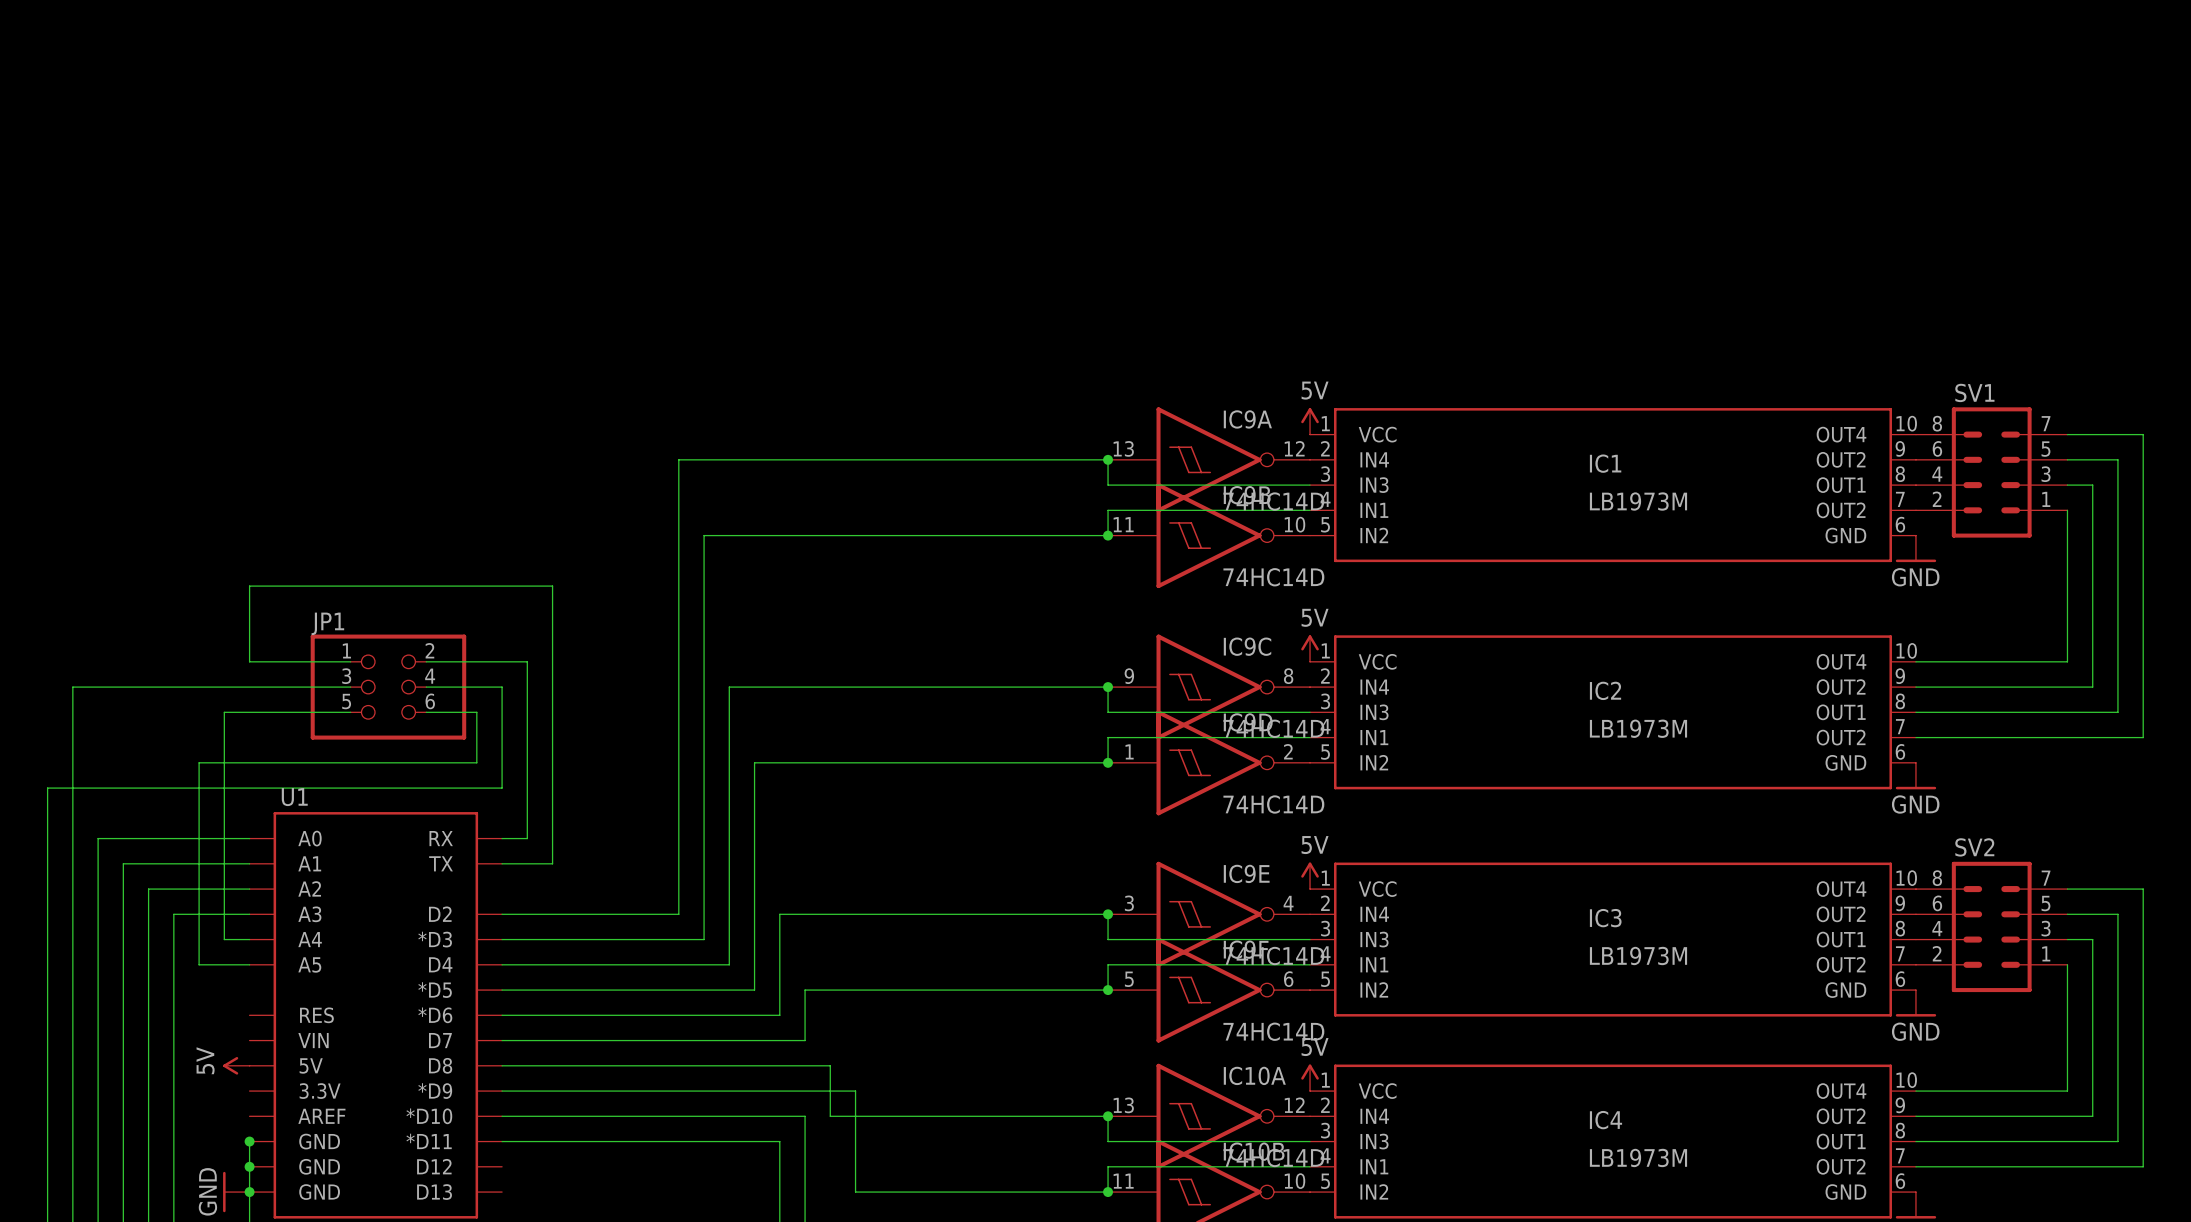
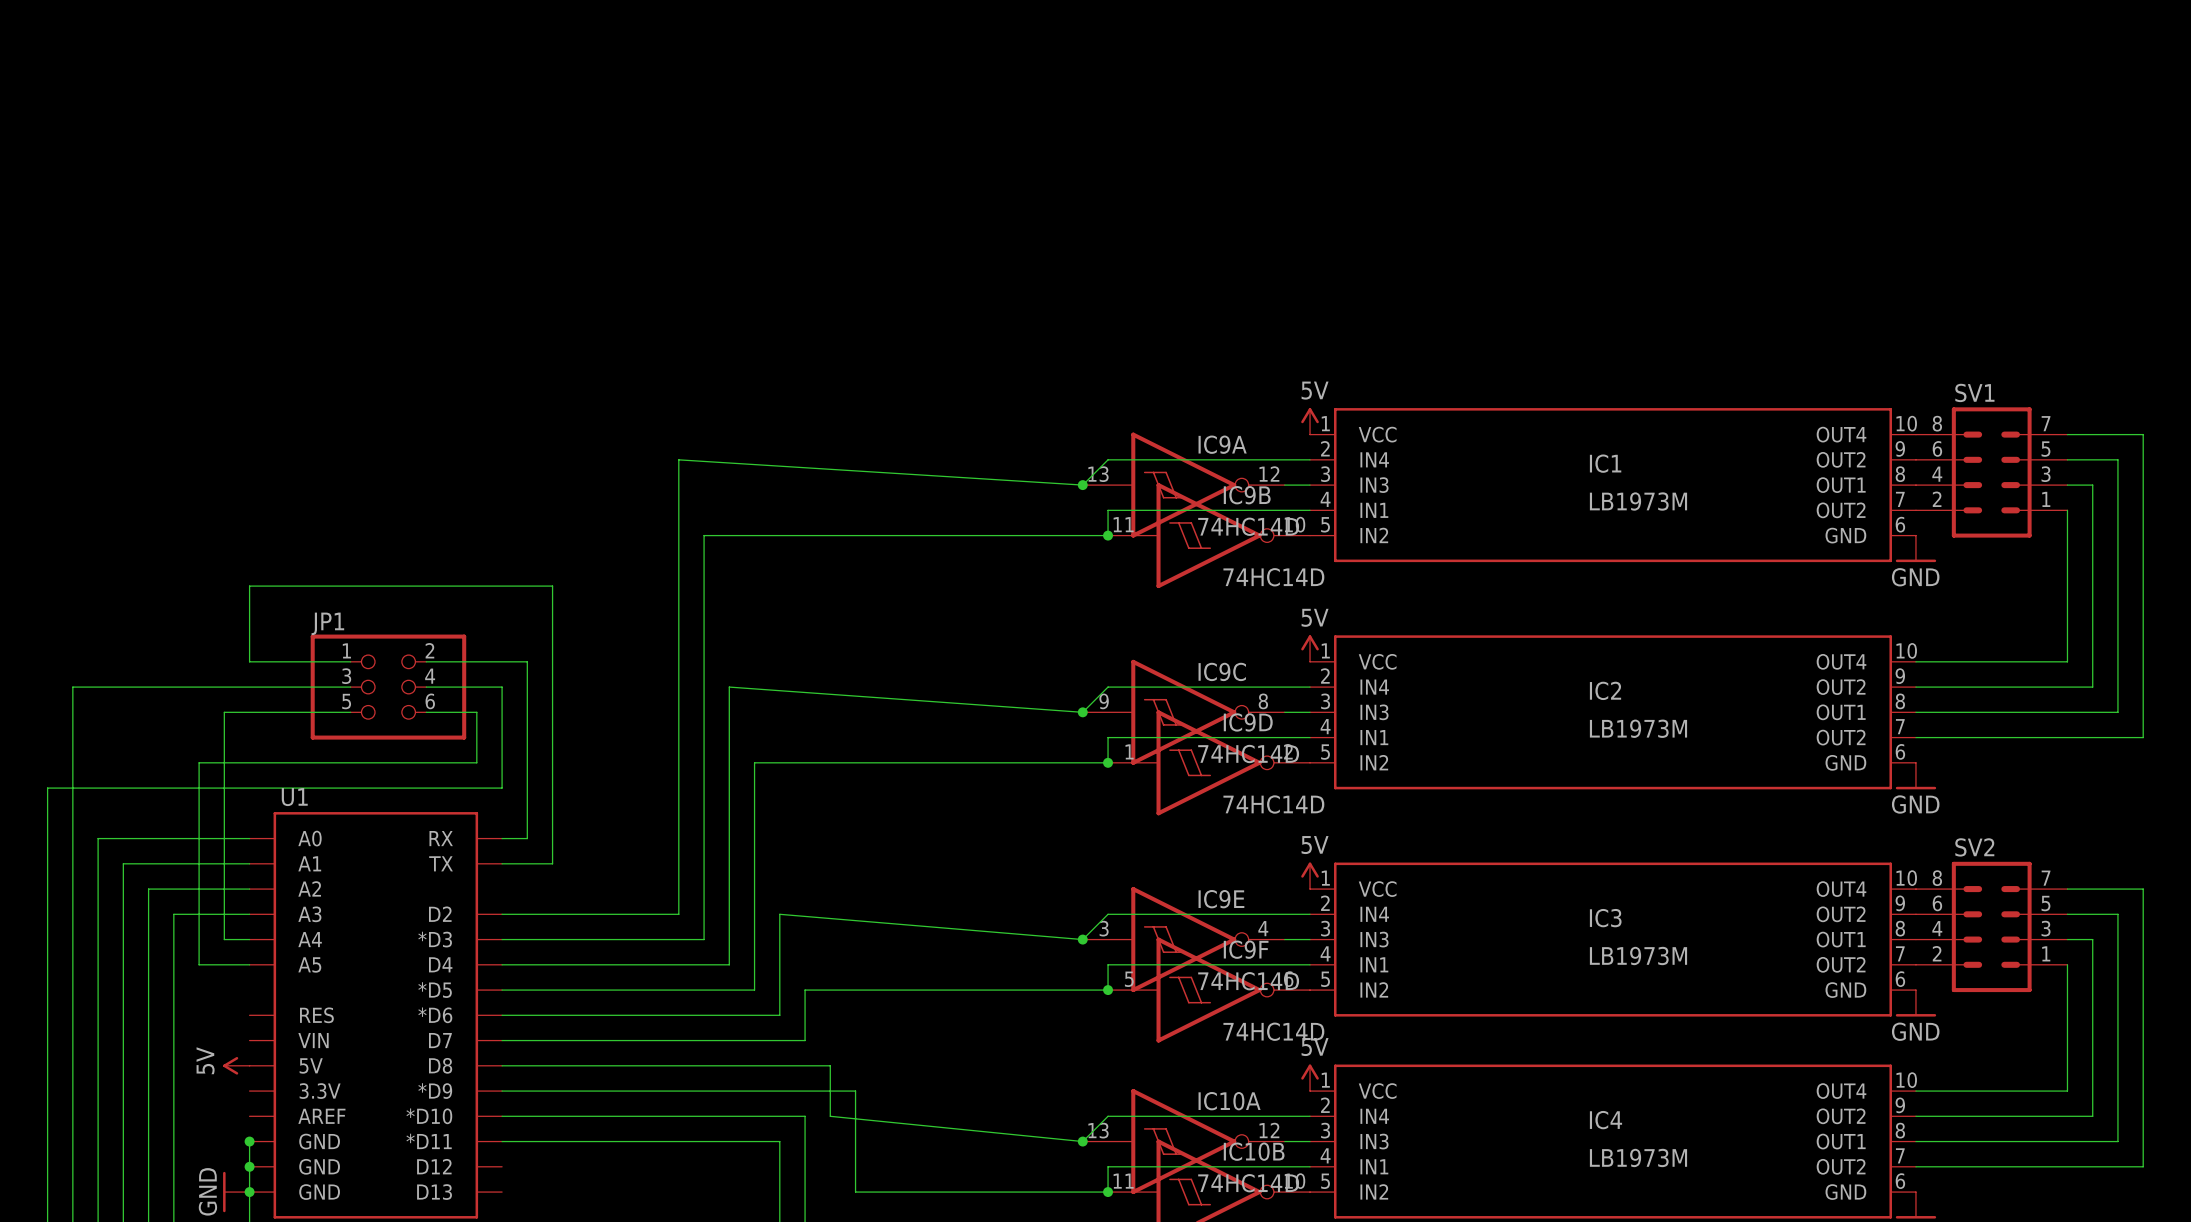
wire: (678, 459) (1108, 459) (1108, 485) (1284, 485) -> (678, 459) (1082, 485) (1108, 459) (1310, 459)
junction position: (1108, 459) -> (1082, 485)
IC9A position: (1209, 459) -> (1183, 485)
wire: (729, 687) (1108, 687) (1108, 712) (1284, 712) -> (729, 687) (1082, 712) (1108, 687) (1310, 687)
junction position: (1108, 687) -> (1082, 712)
IC9C position: (1209, 687) -> (1183, 712)
wire: (779, 914) (1108, 914) (1108, 939) (1284, 939) -> (779, 914) (1082, 939) (1108, 914) (1310, 914)
junction position: (1108, 914) -> (1082, 939)
IC9E position: (1209, 914) -> (1183, 939)
wire: (830, 1116) (1108, 1116) (1108, 1141) (1284, 1141) -> (830, 1116) (1082, 1141) (1108, 1116) (1310, 1116)
junction position: (1108, 1116) -> (1082, 1141)
IC10A position: (1209, 1116) -> (1183, 1141)

